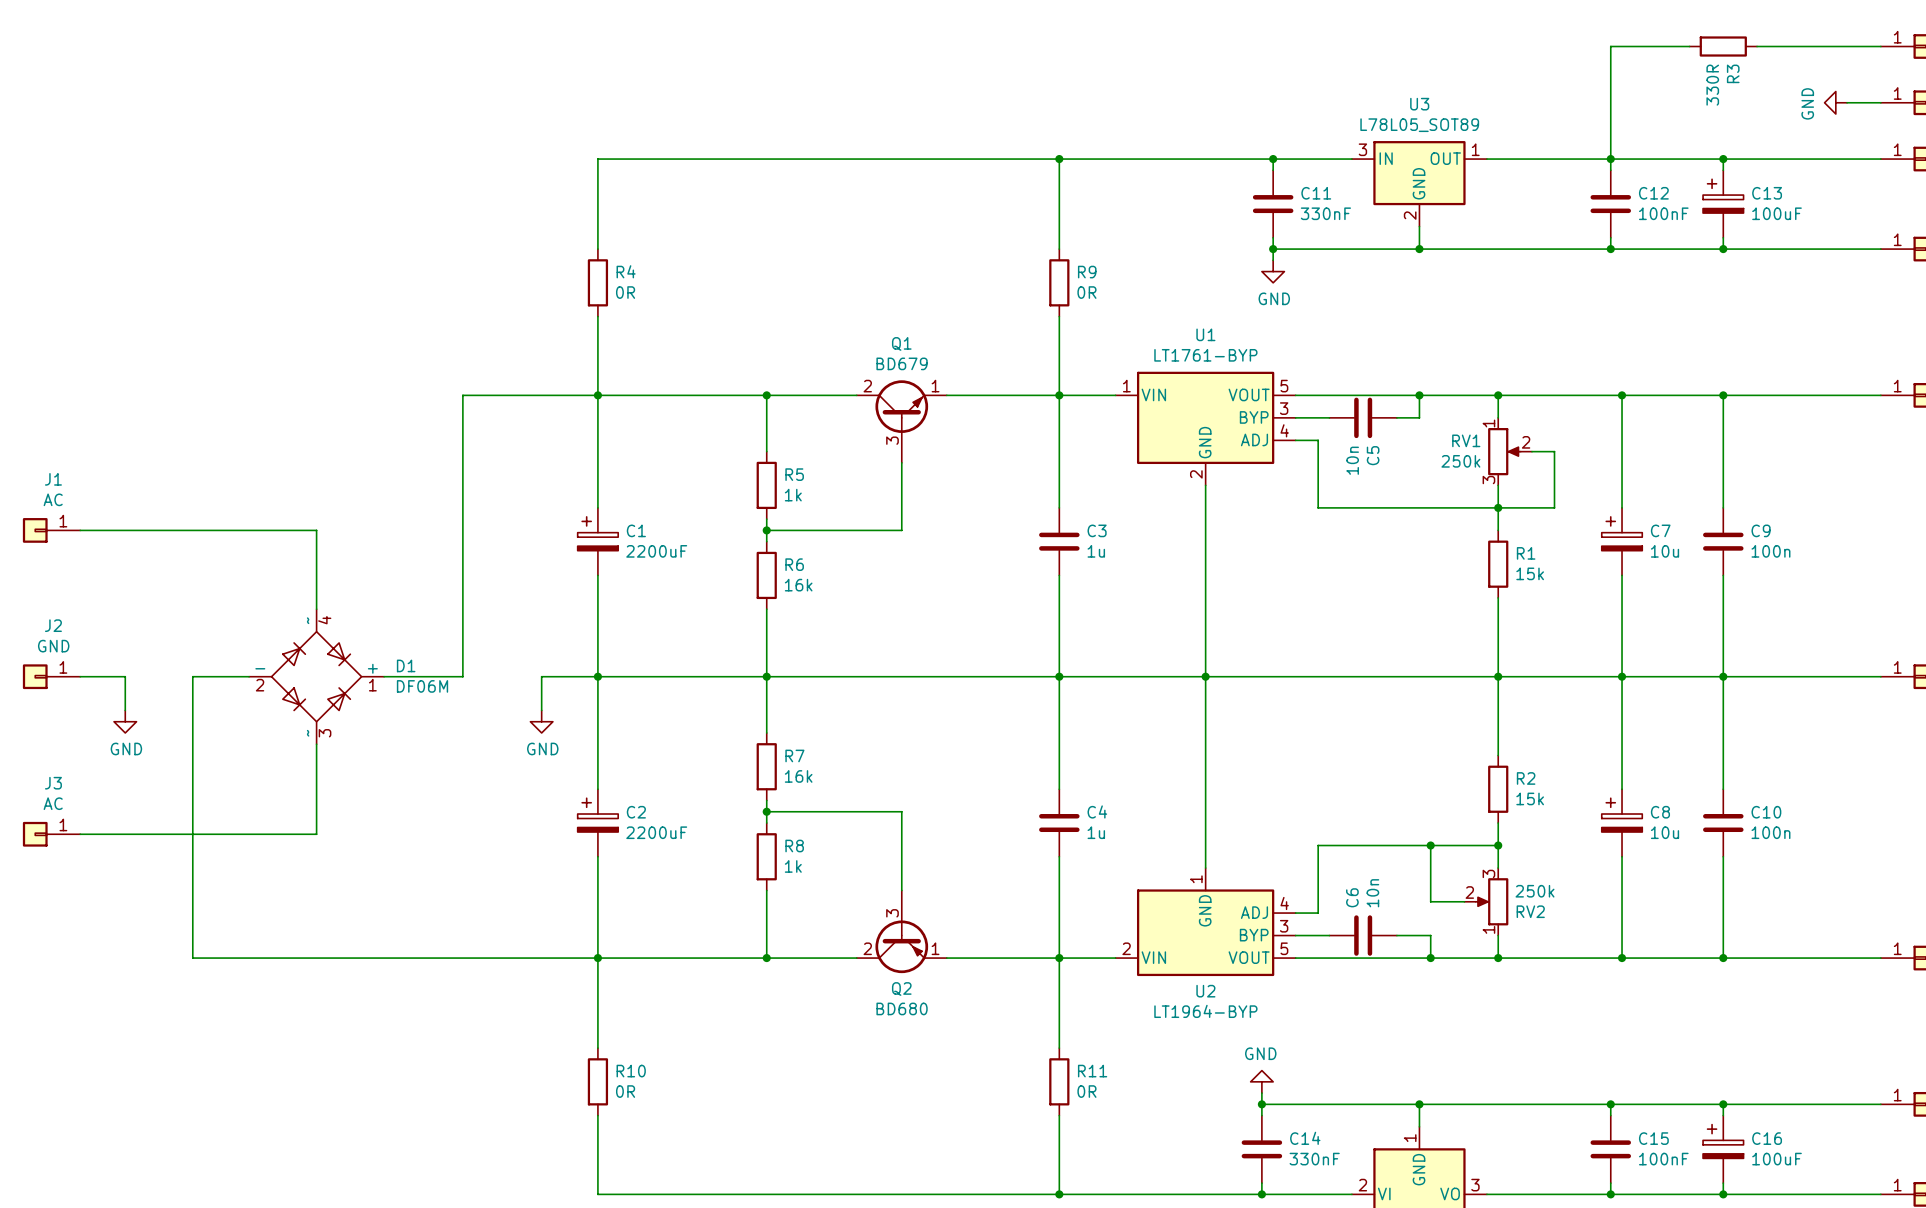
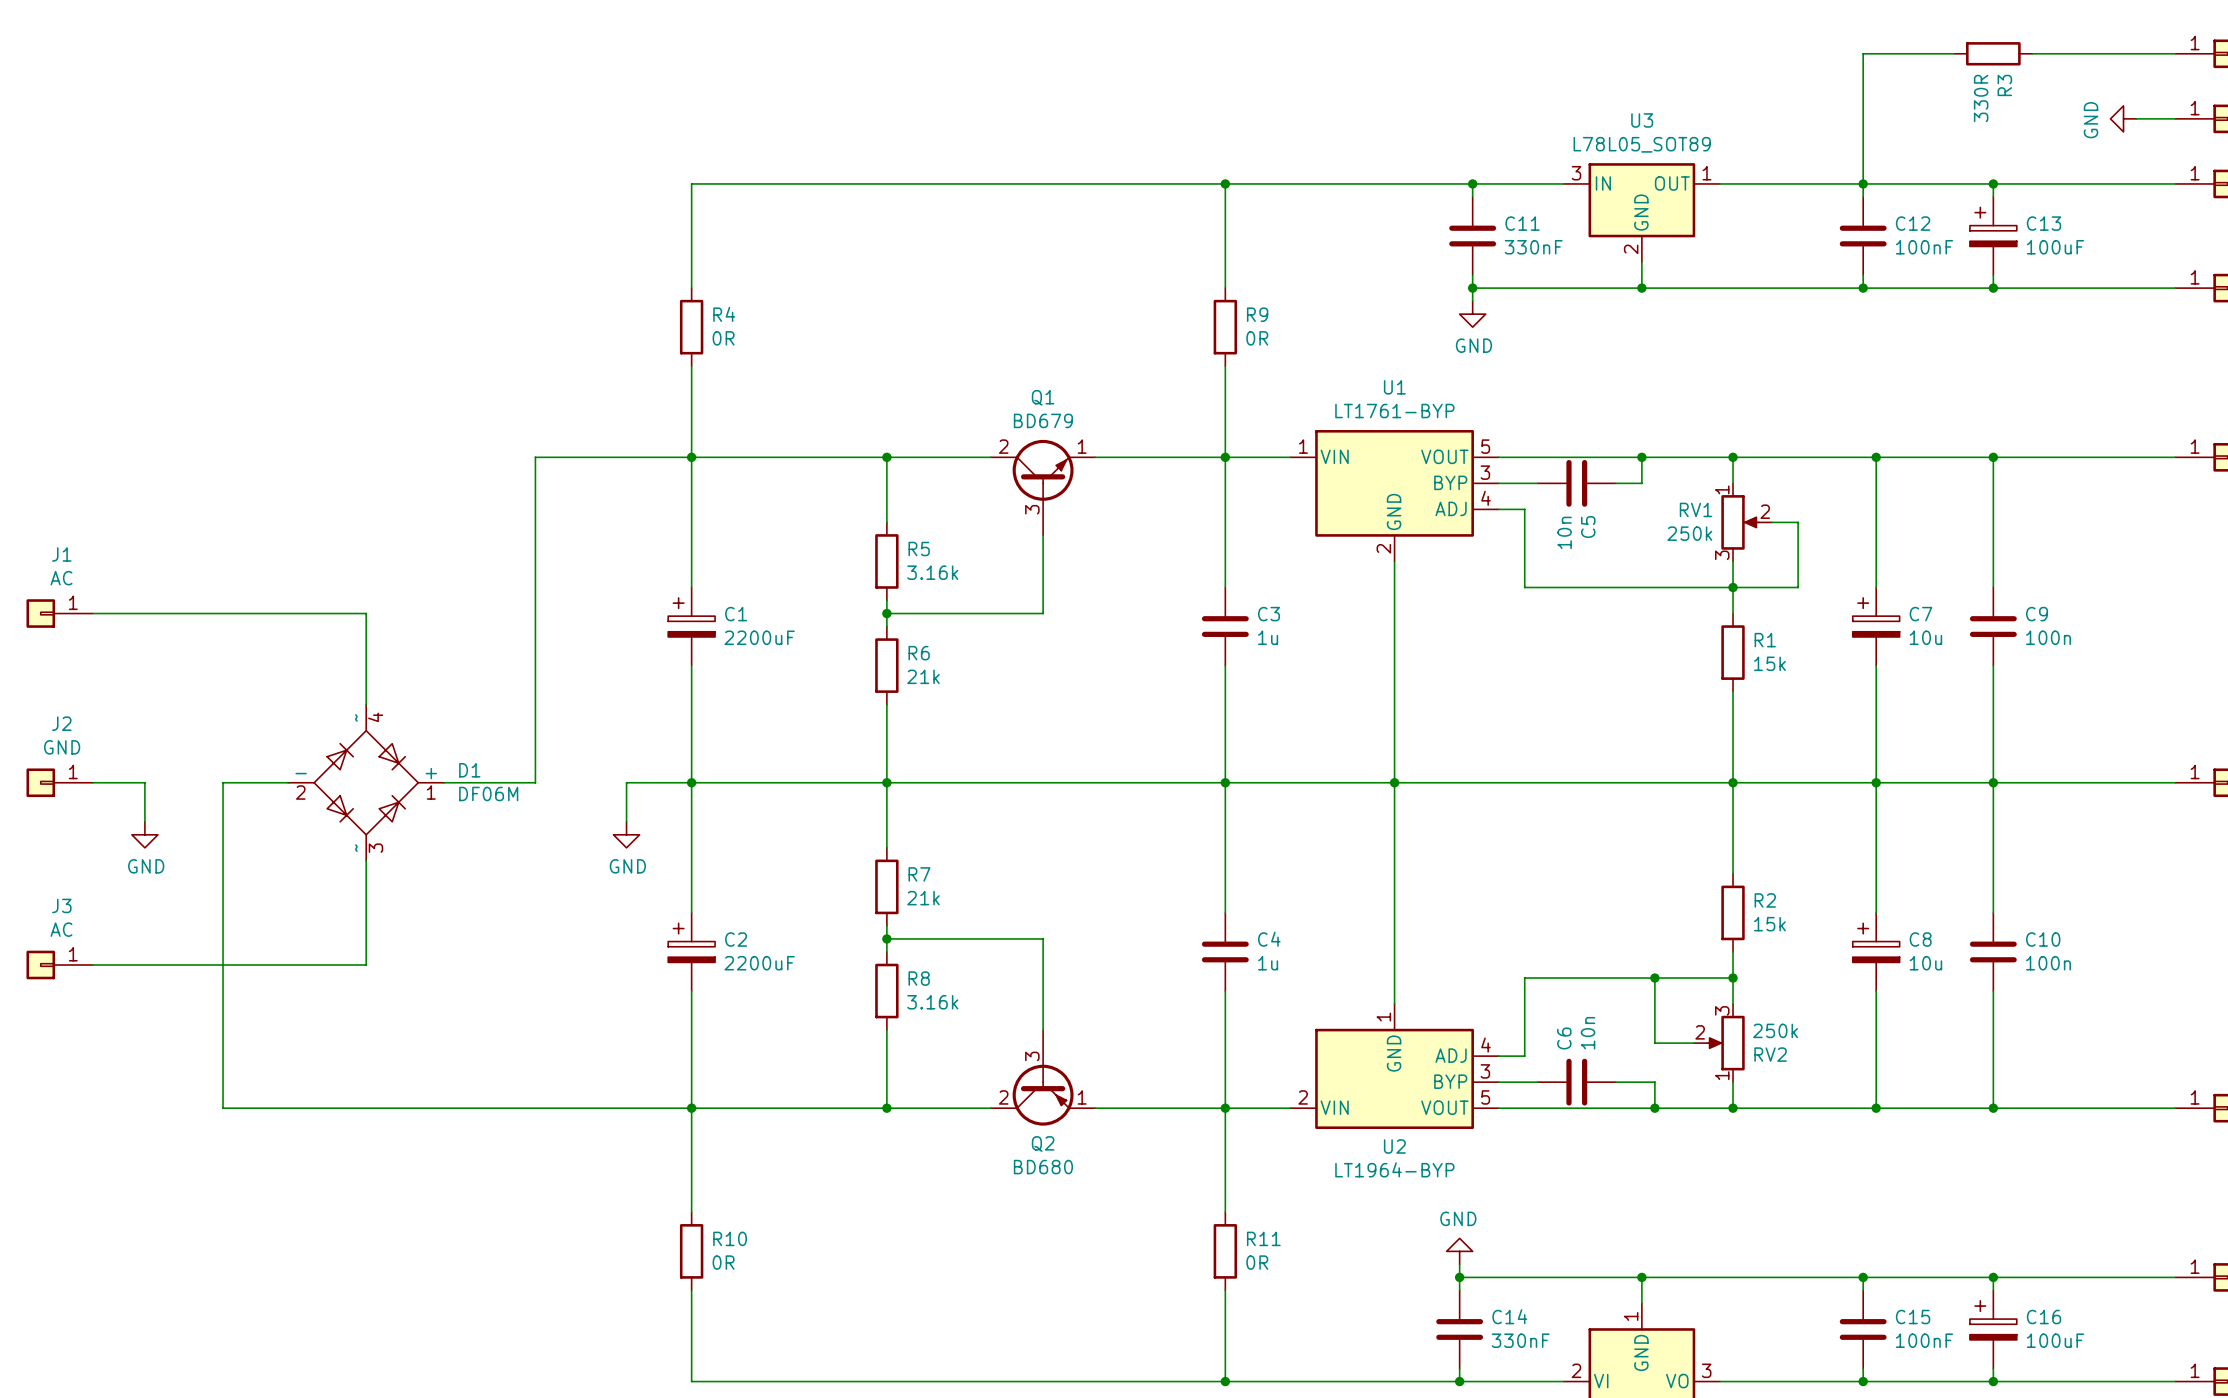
R5 value: 1k (793, 495) -> 3.16k (932, 572)
R6 value: 16k (798, 585) -> 21k (923, 676)
R7 value: 16k (798, 776) -> 21k (923, 898)
R8 value: 1k (793, 866) -> 3.16k (932, 1002)

